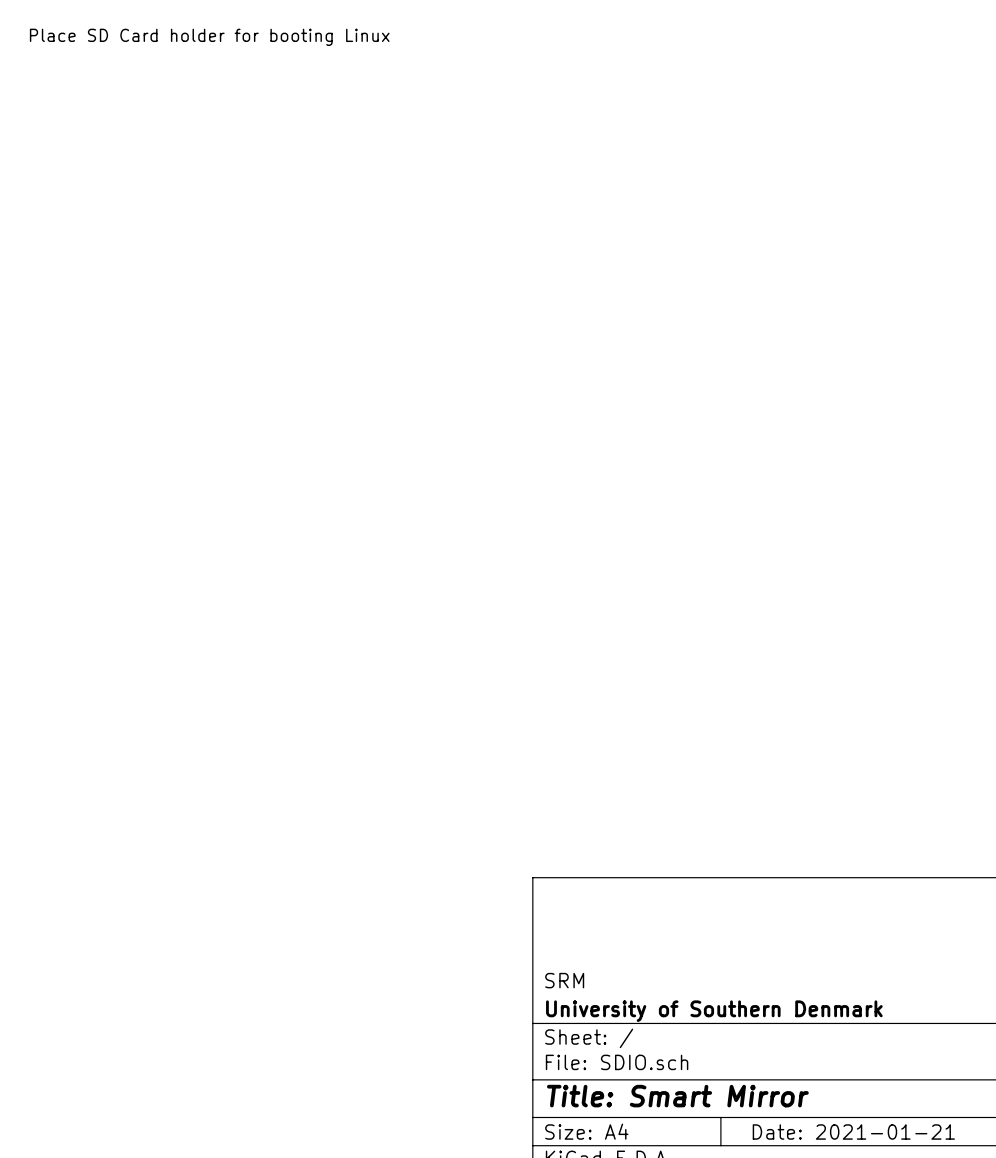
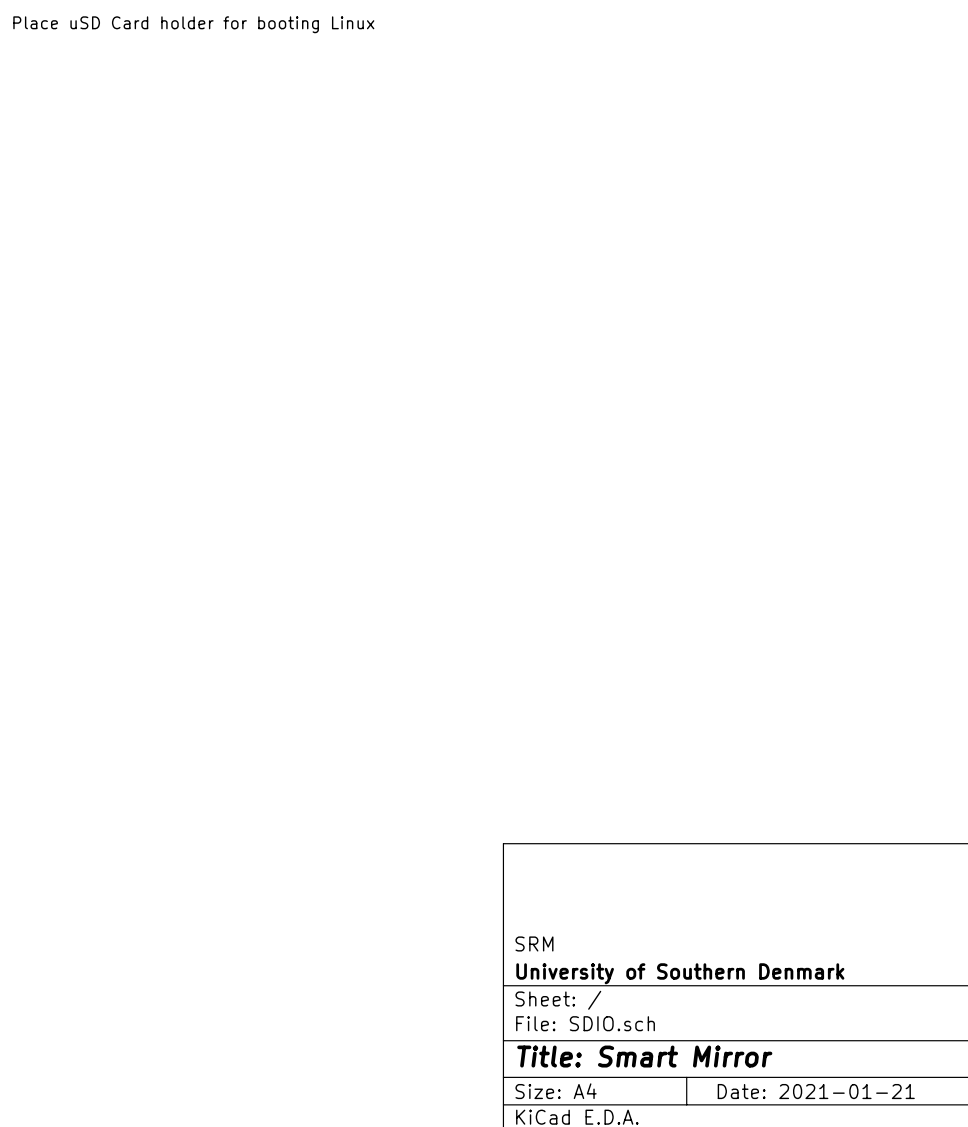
text: Place SD Card holder for booting Linux (209, 37) -> Place uSD Card holder for booting Linux (193, 24)

